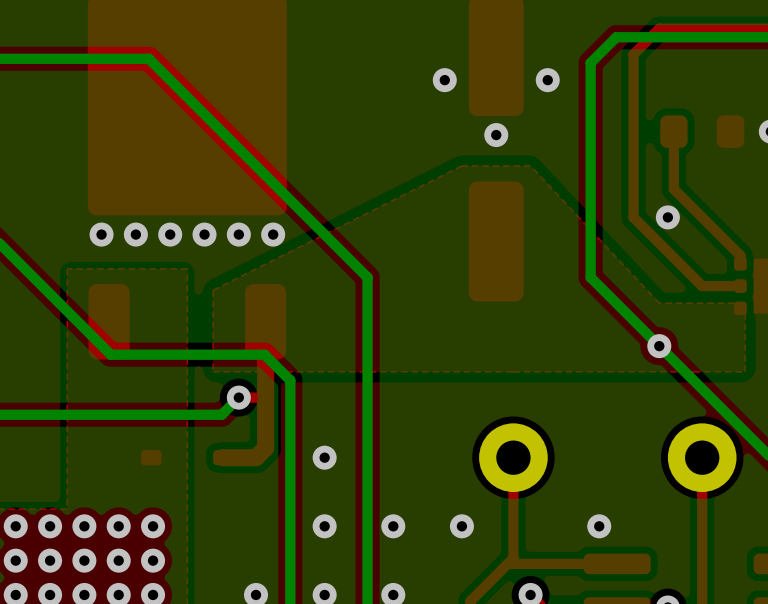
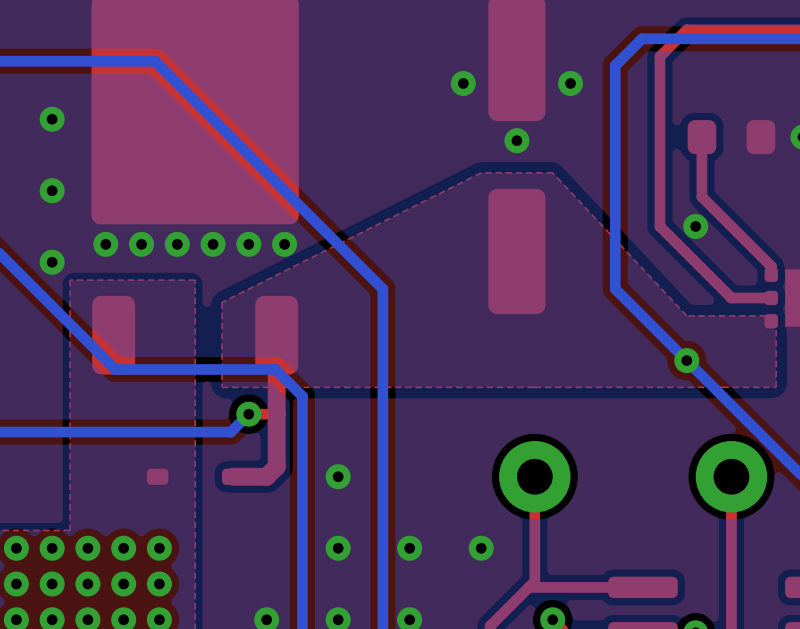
via: none -> (52, 119)
via: none -> (52, 190)
via: none -> (52, 262)
via: (599, 526) -> none

